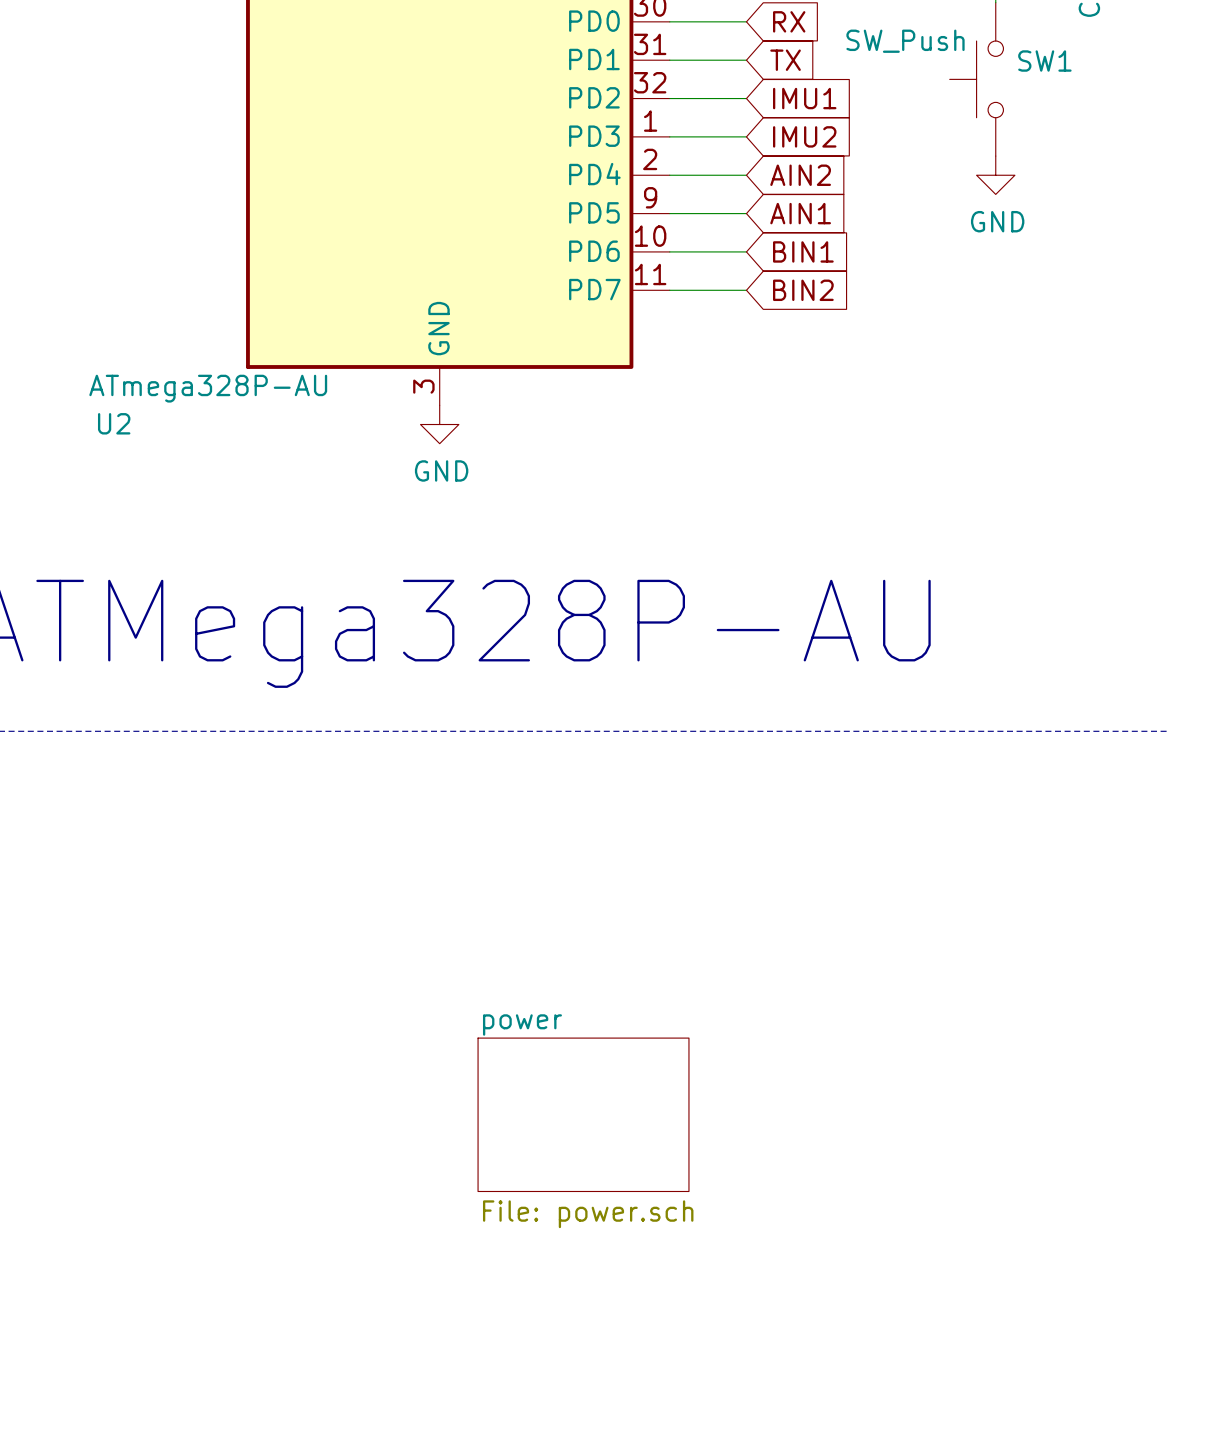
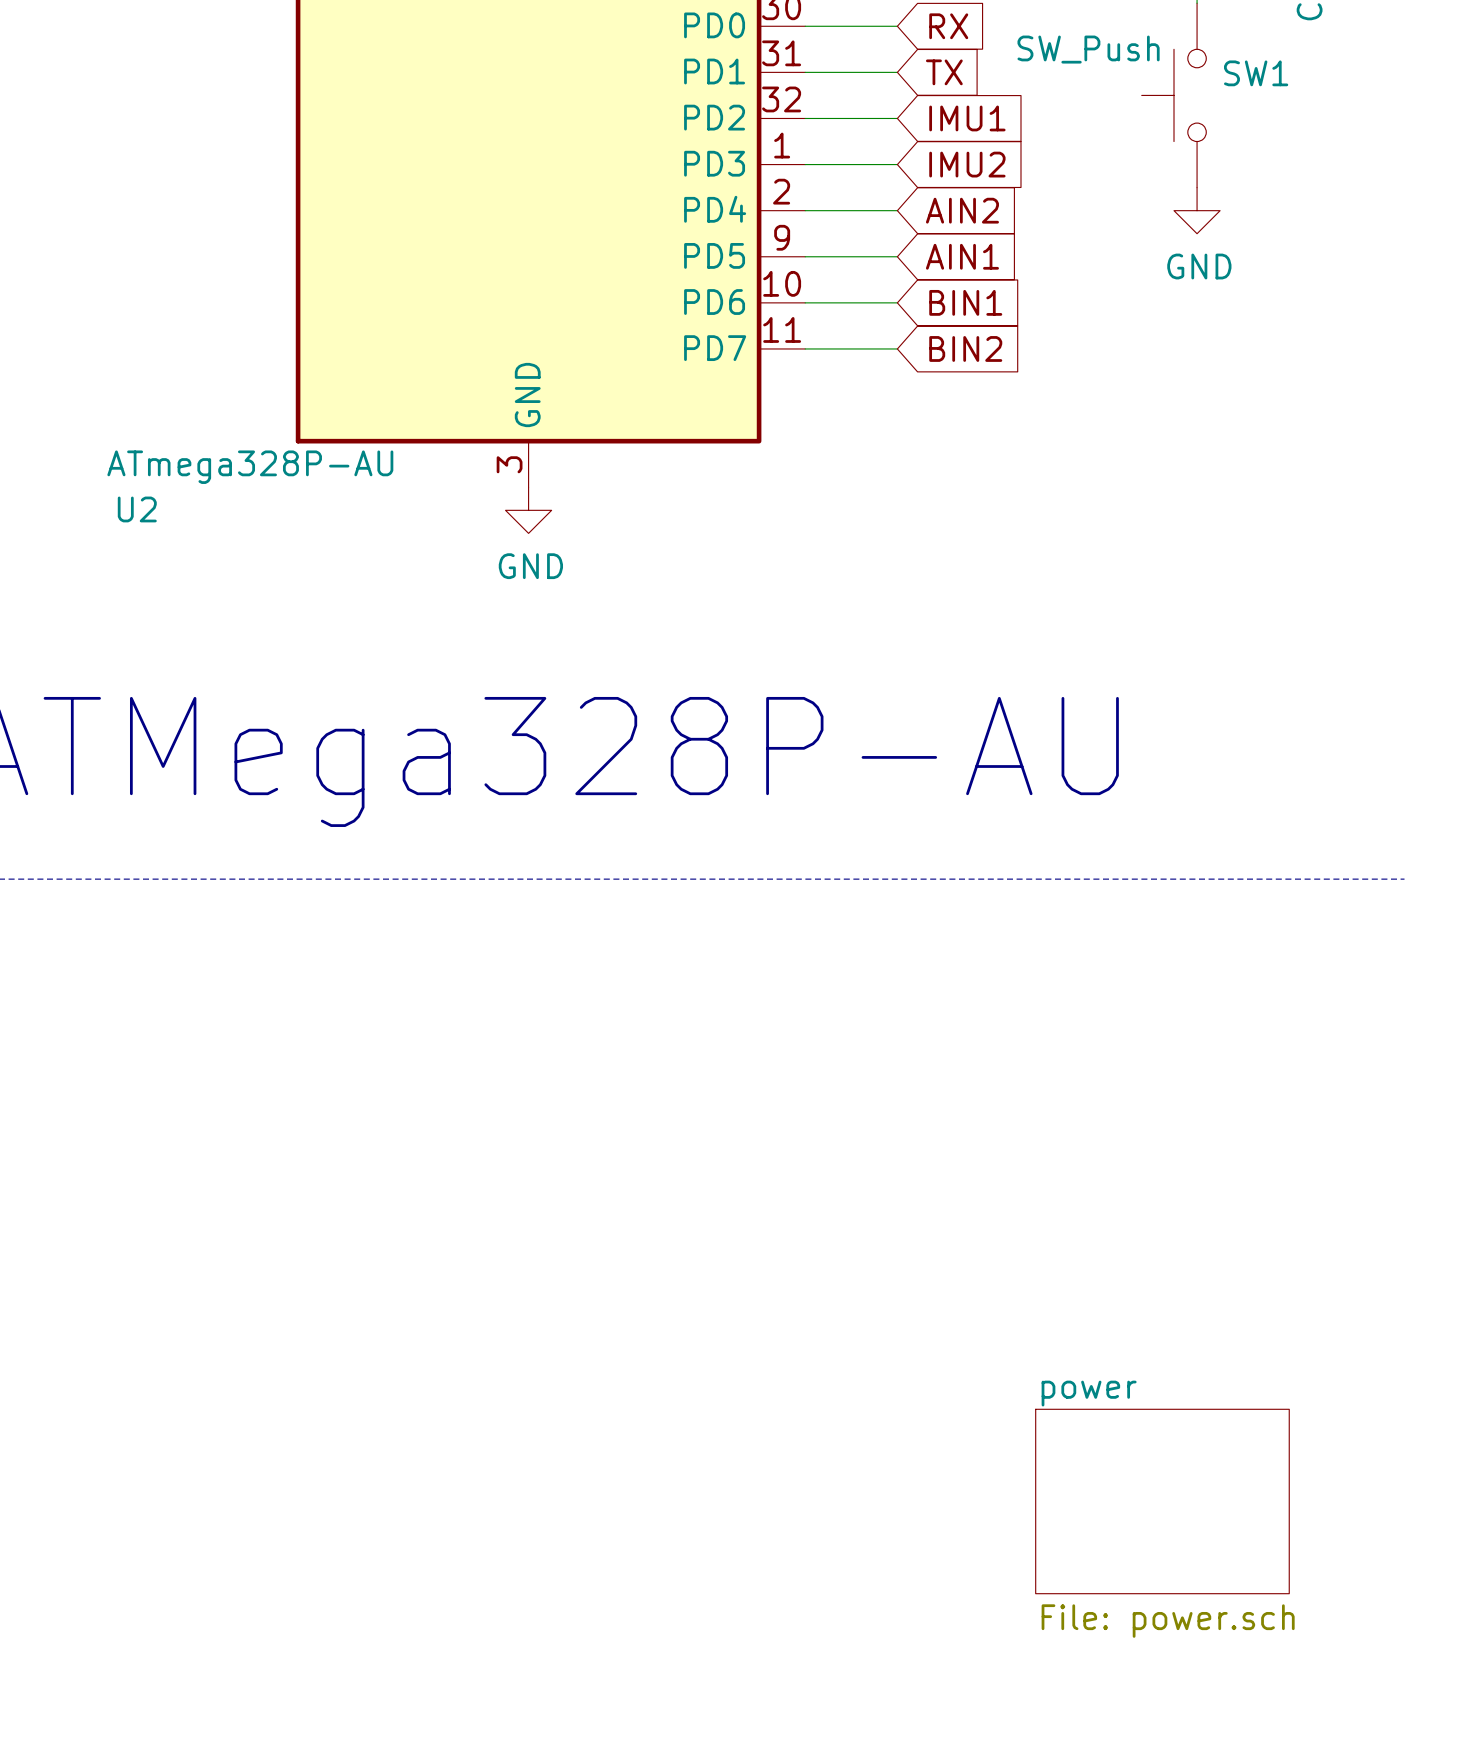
sheet power: File: power.sch (583, 1114) -> none
sheet power: none -> File: power.sch (1162, 1501)

